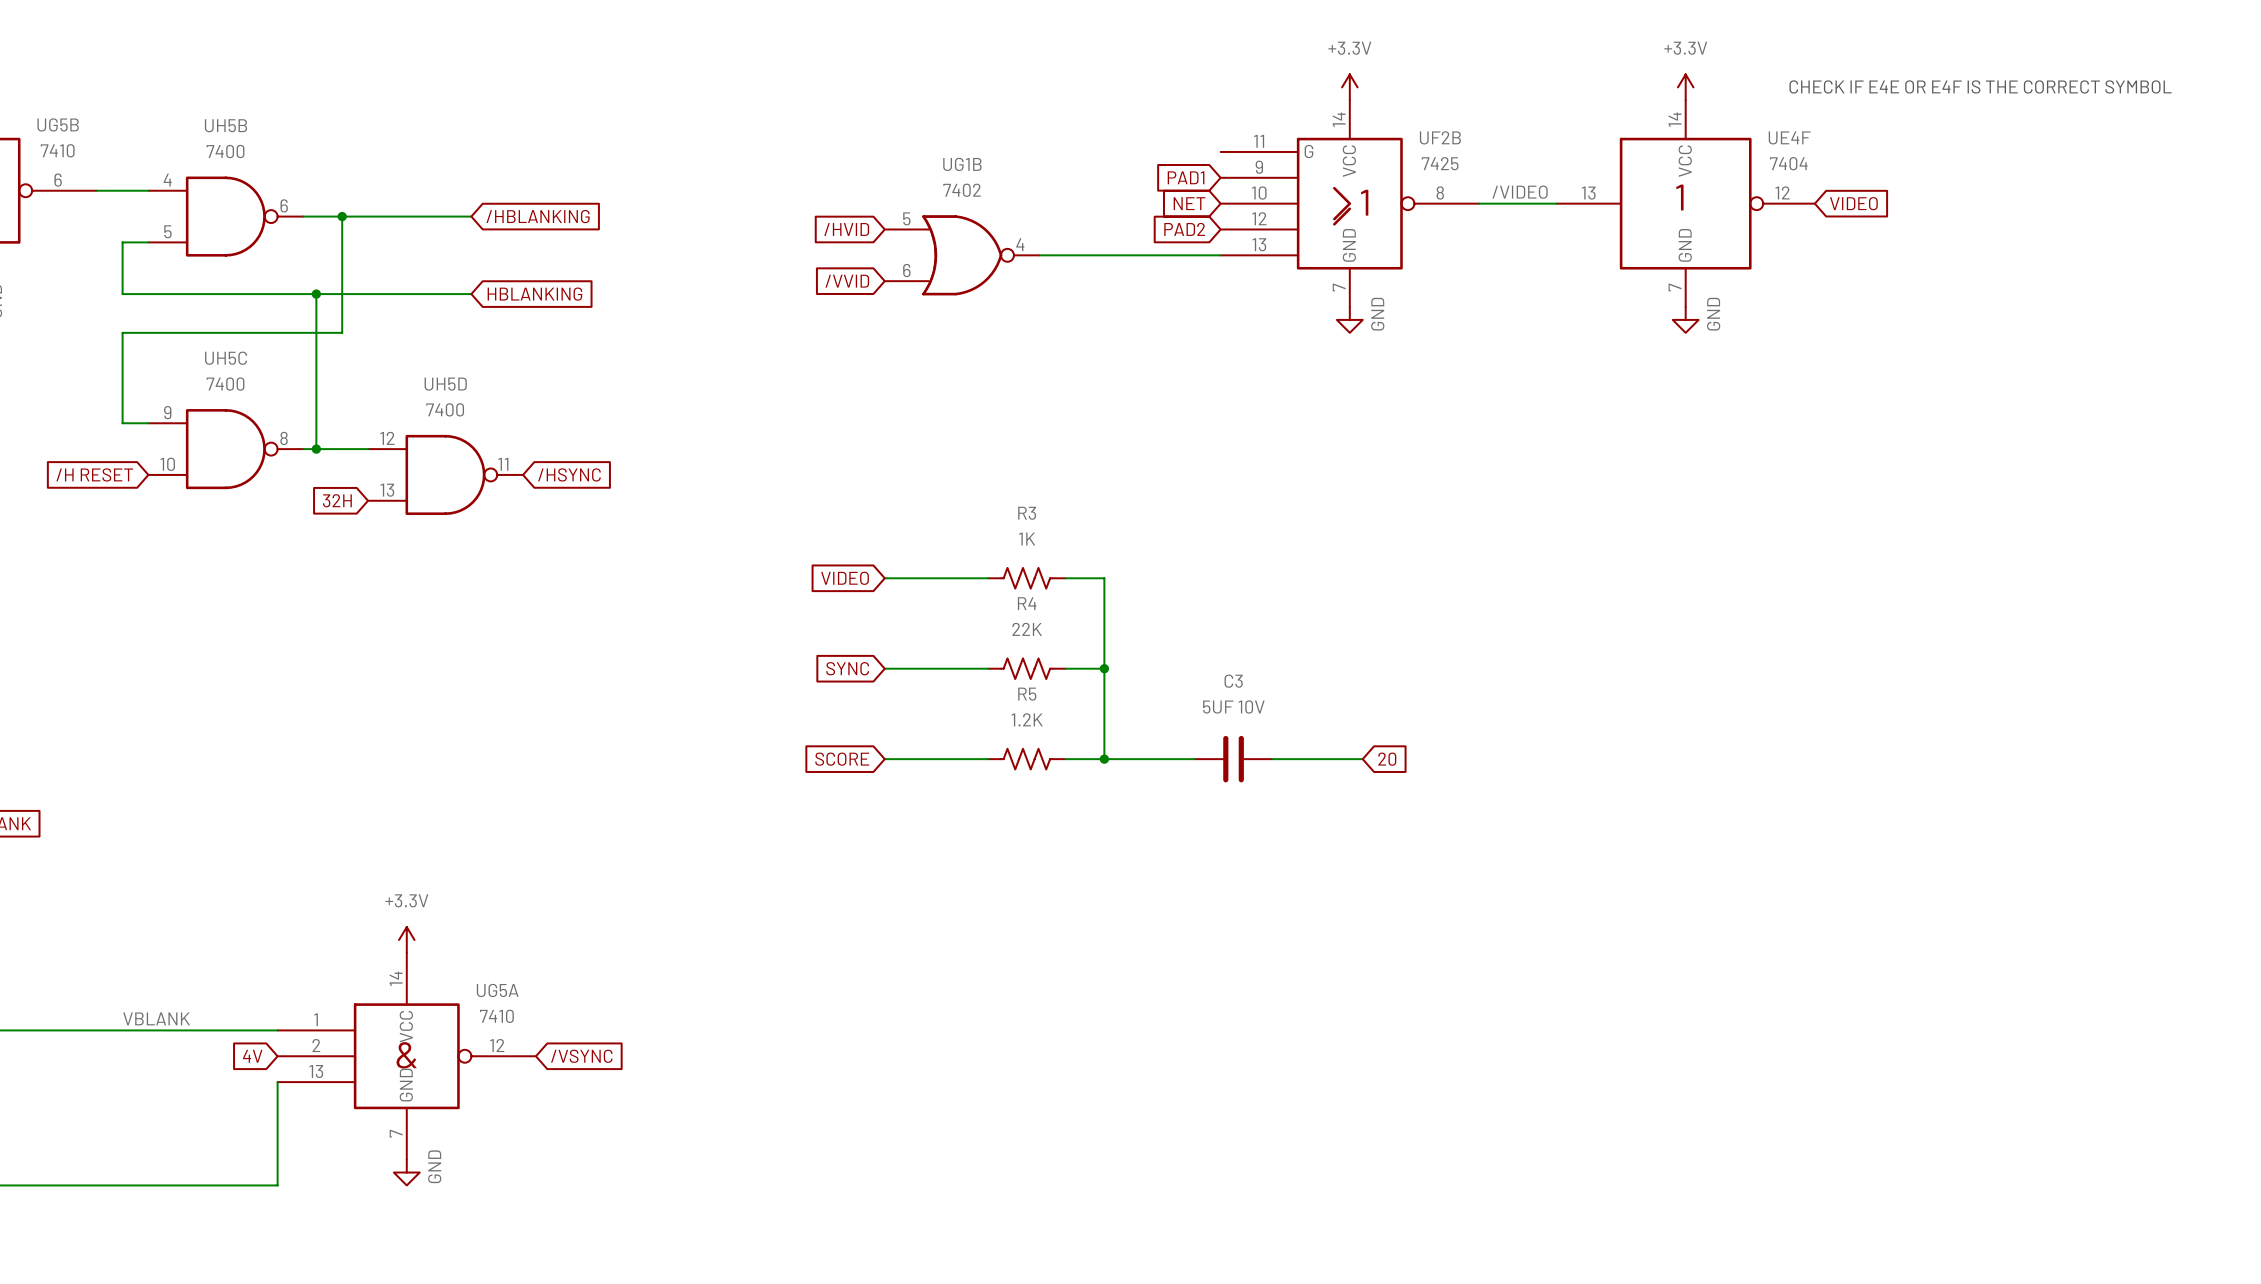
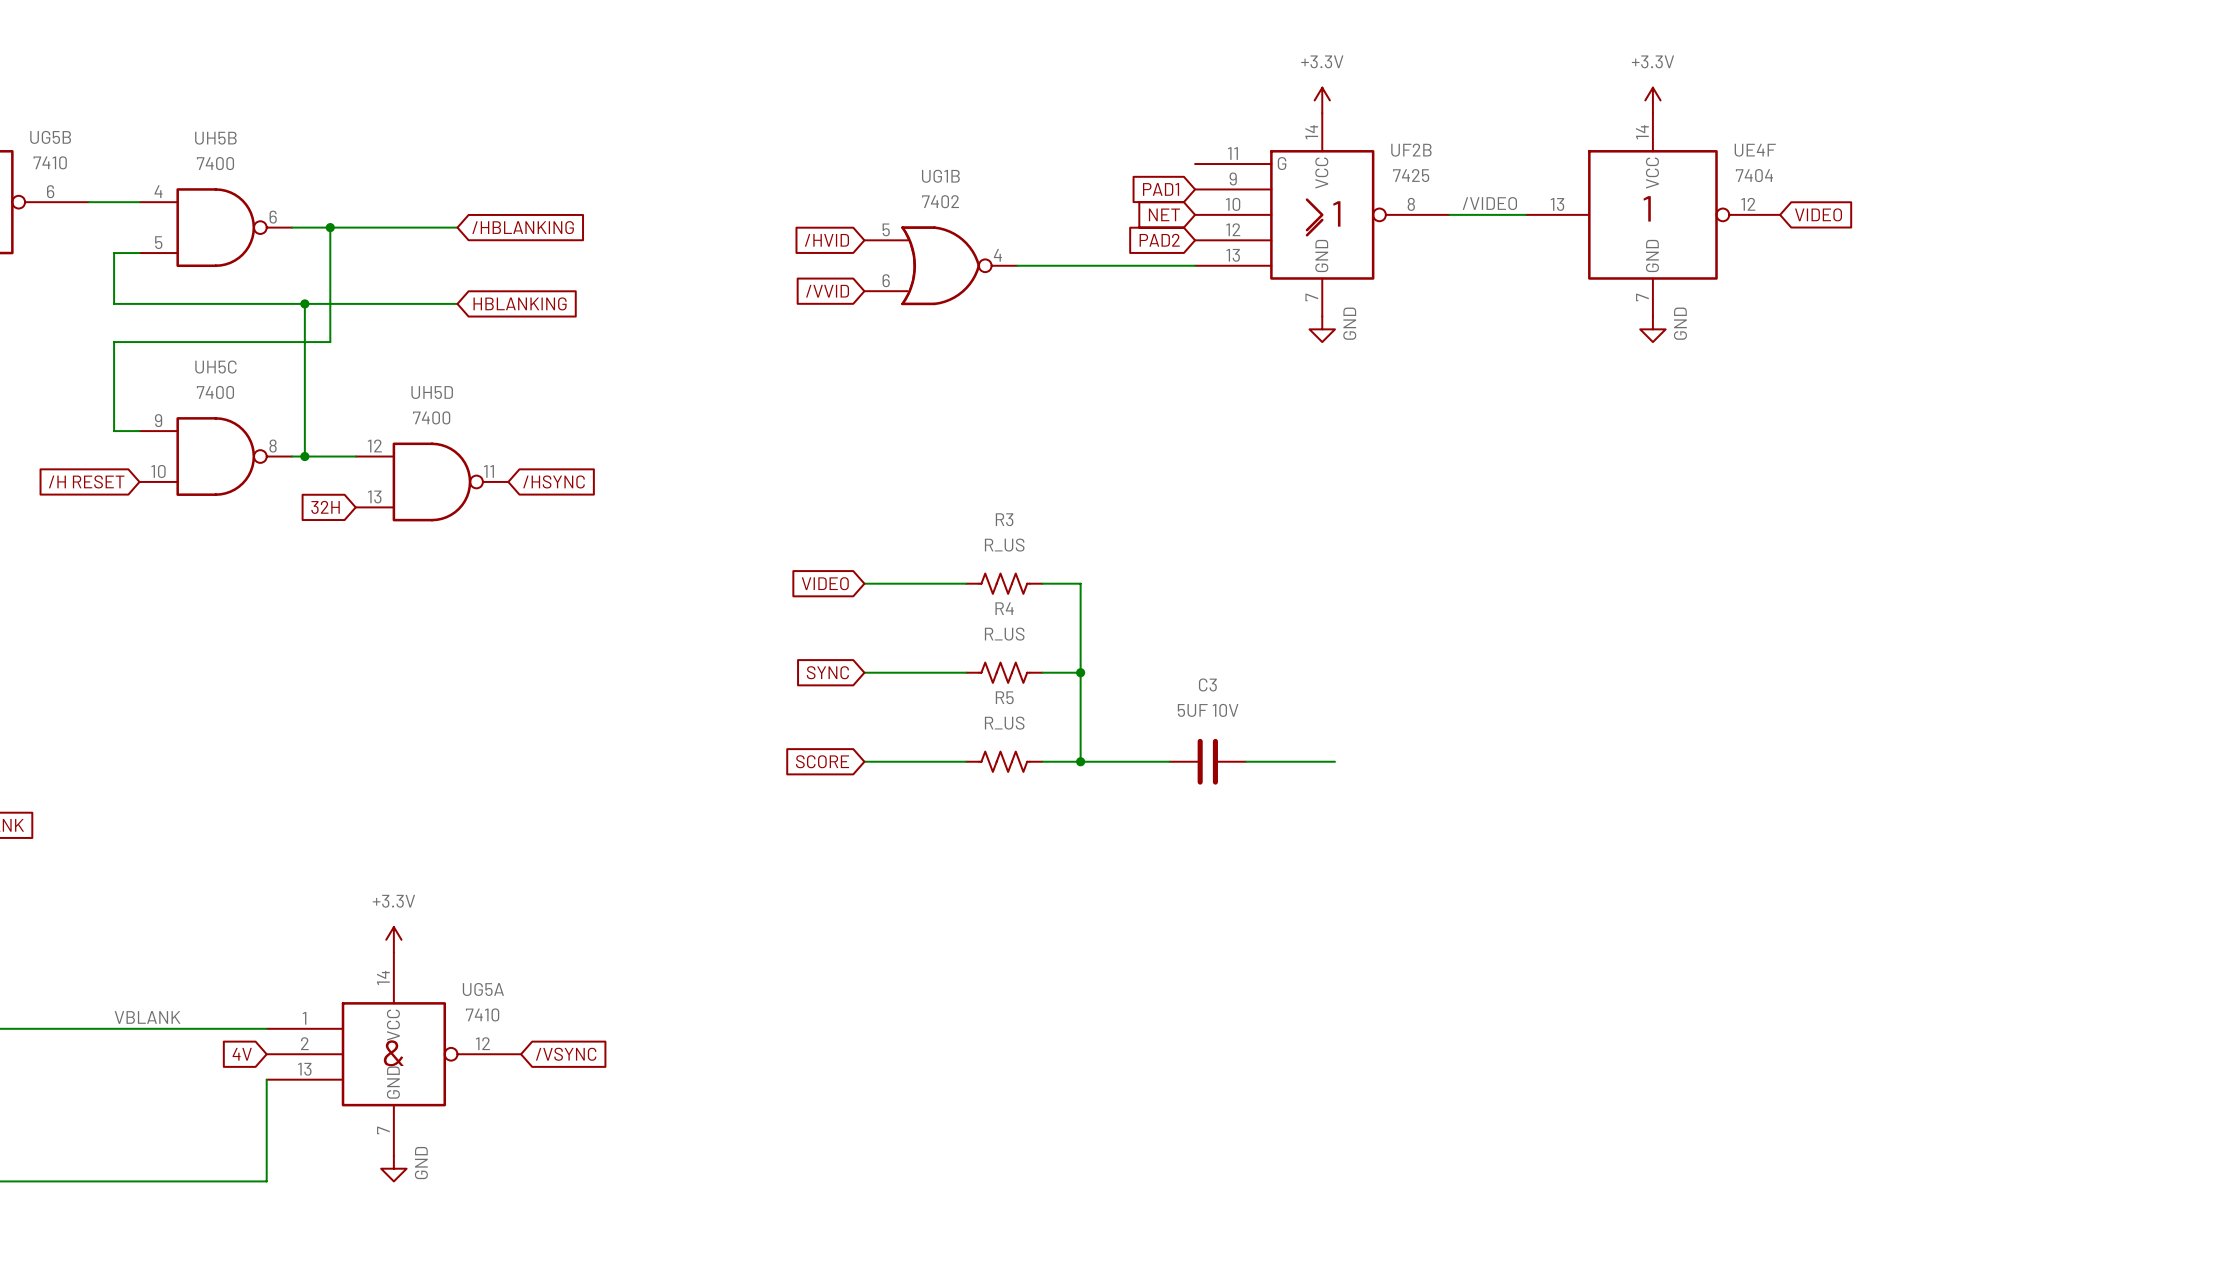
text: CHECK IF E4E OR E4F IS THE CORRECT SYMBOL (1980, 86) -> none
R3 value: 1K (1027, 539) -> R_US (1004, 545)
R4 value: 22K (1027, 629) -> R_US (1004, 634)
R5 value: 1.2K (1027, 719) -> R_US (1004, 723)
global label: 20 (1387, 759) -> none

